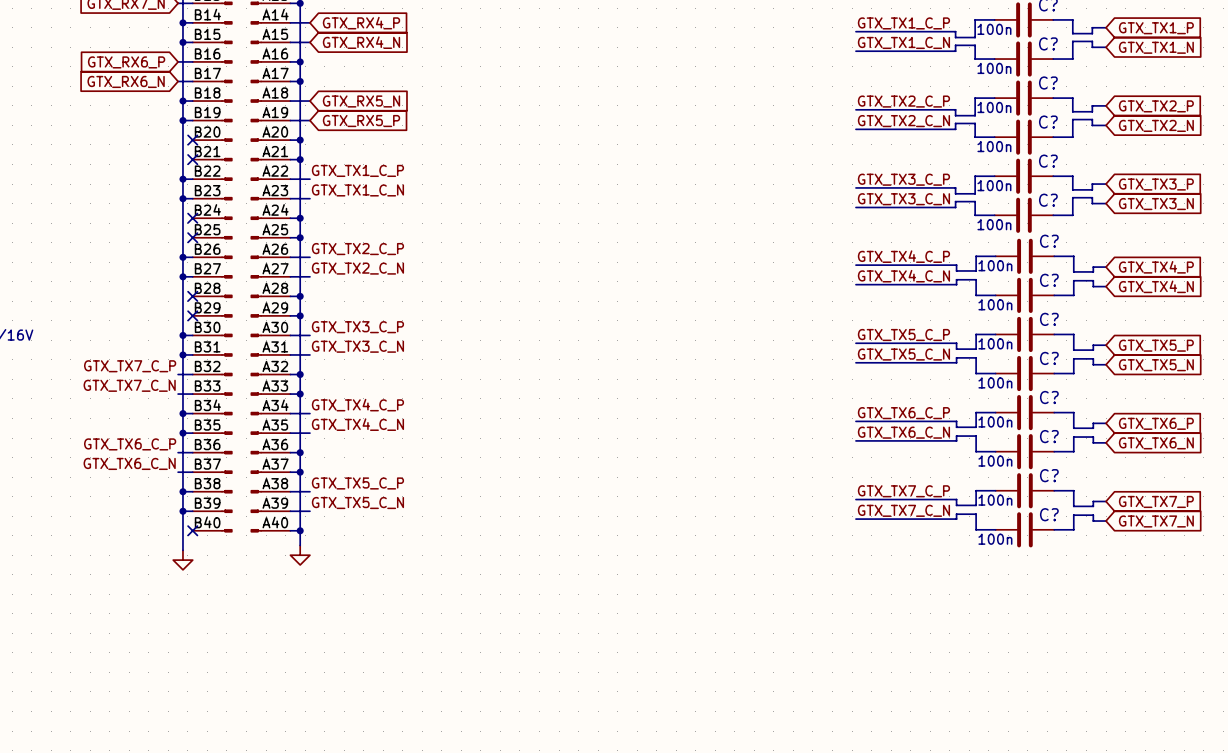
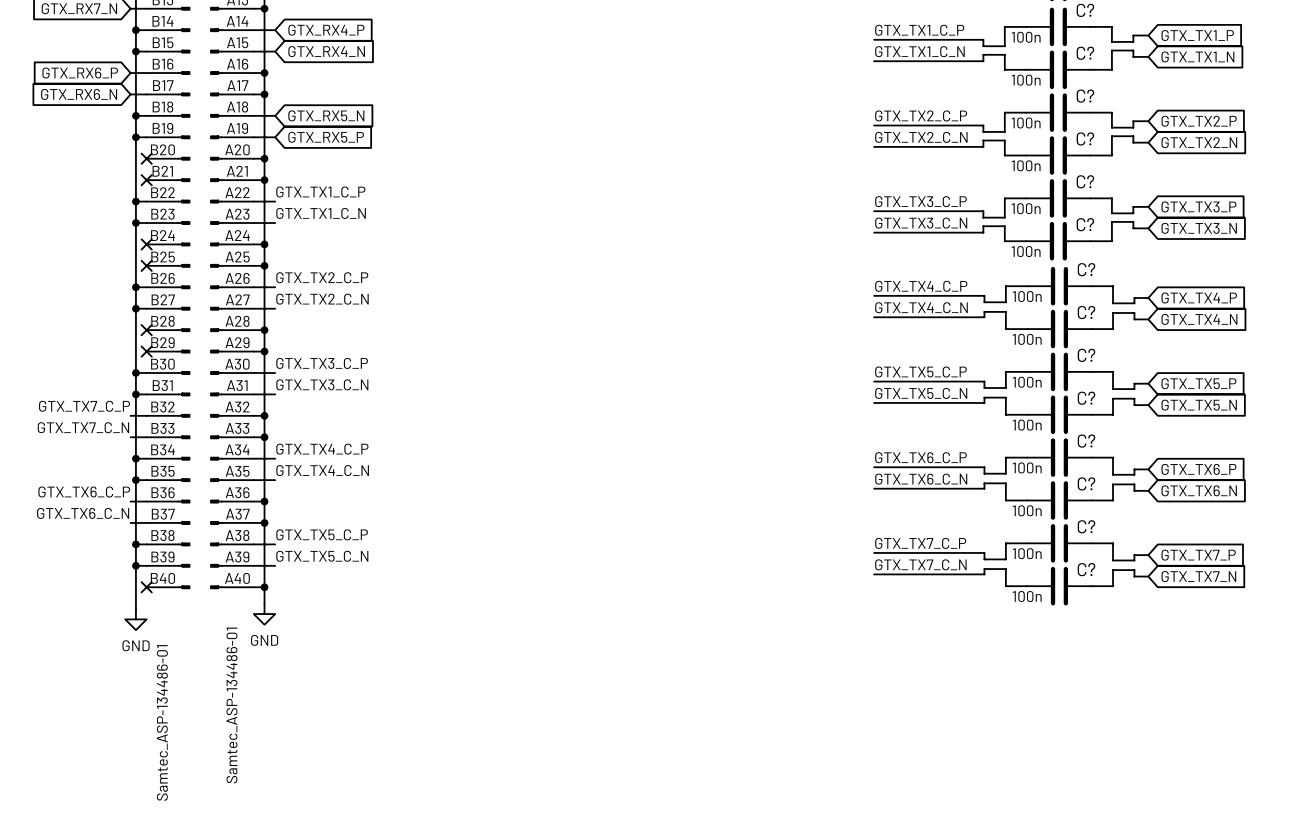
power symbol text: none -> GND (264, 640)
power symbol text: none -> GND (136, 645)
part value: none -> Samtec_ASP-134486-01 (162, 722)
part value: none -> Samtec_ASP-134486-01 (231, 705)

